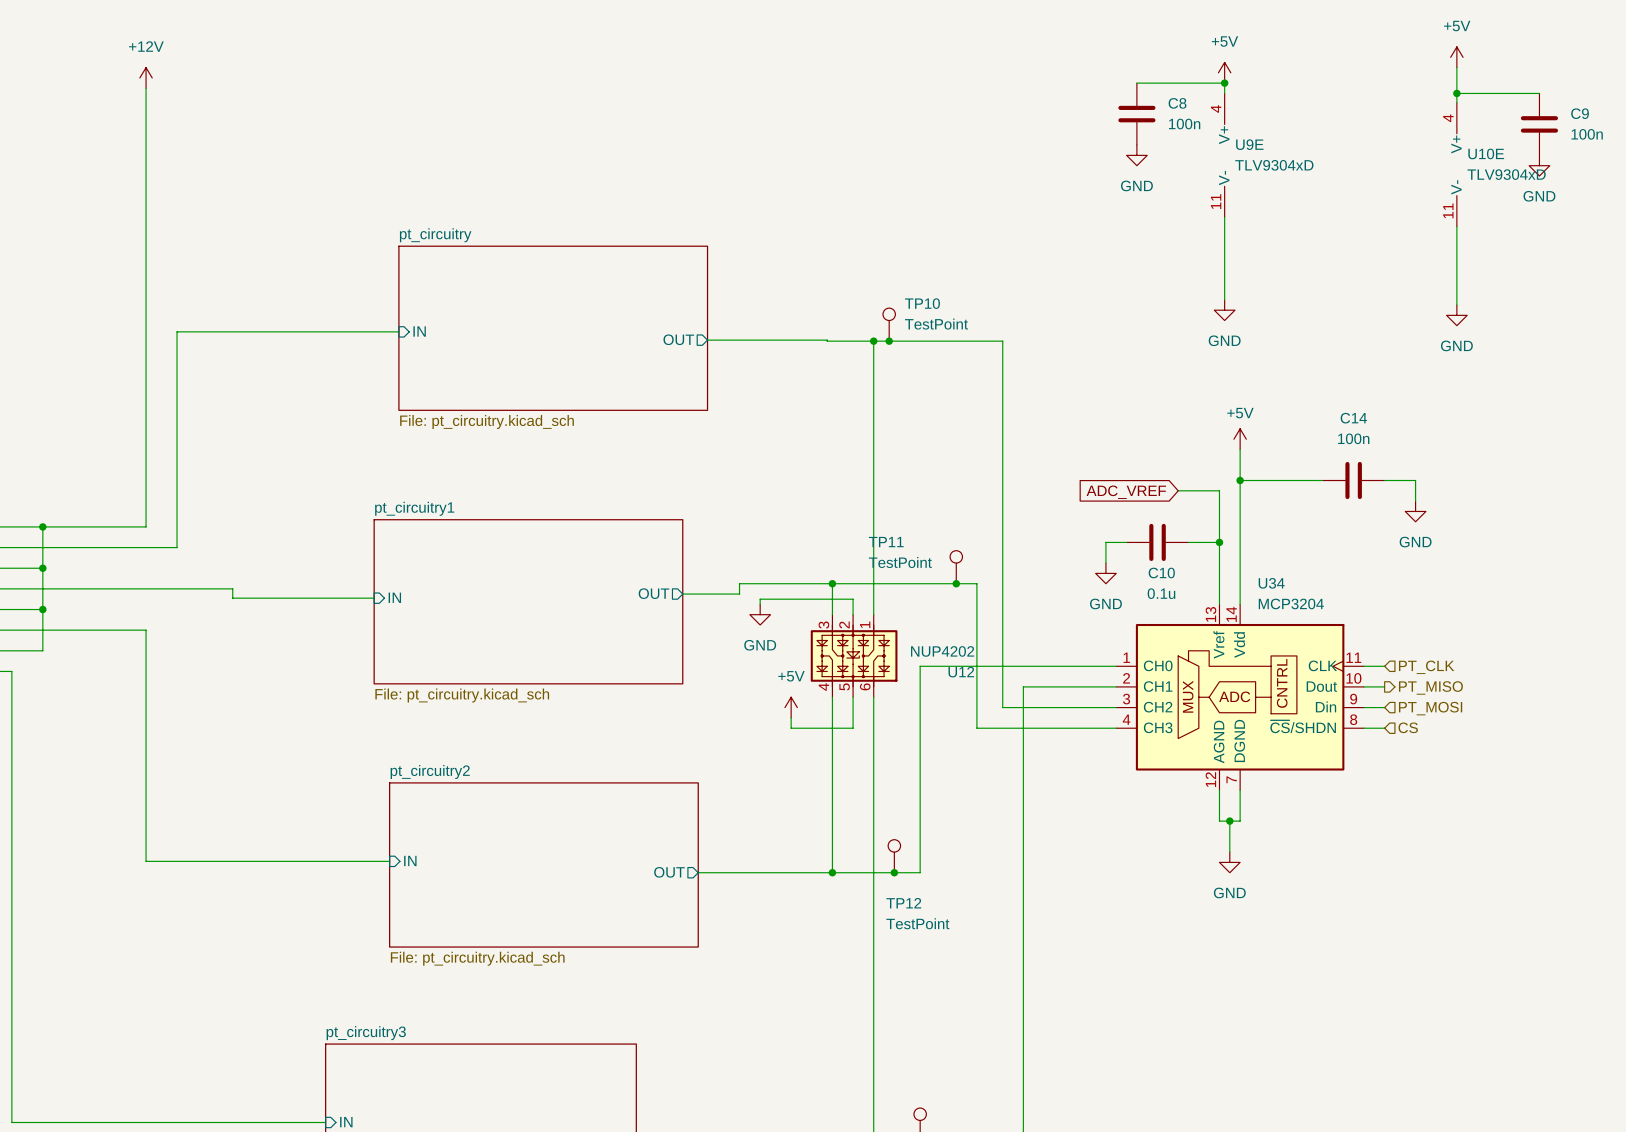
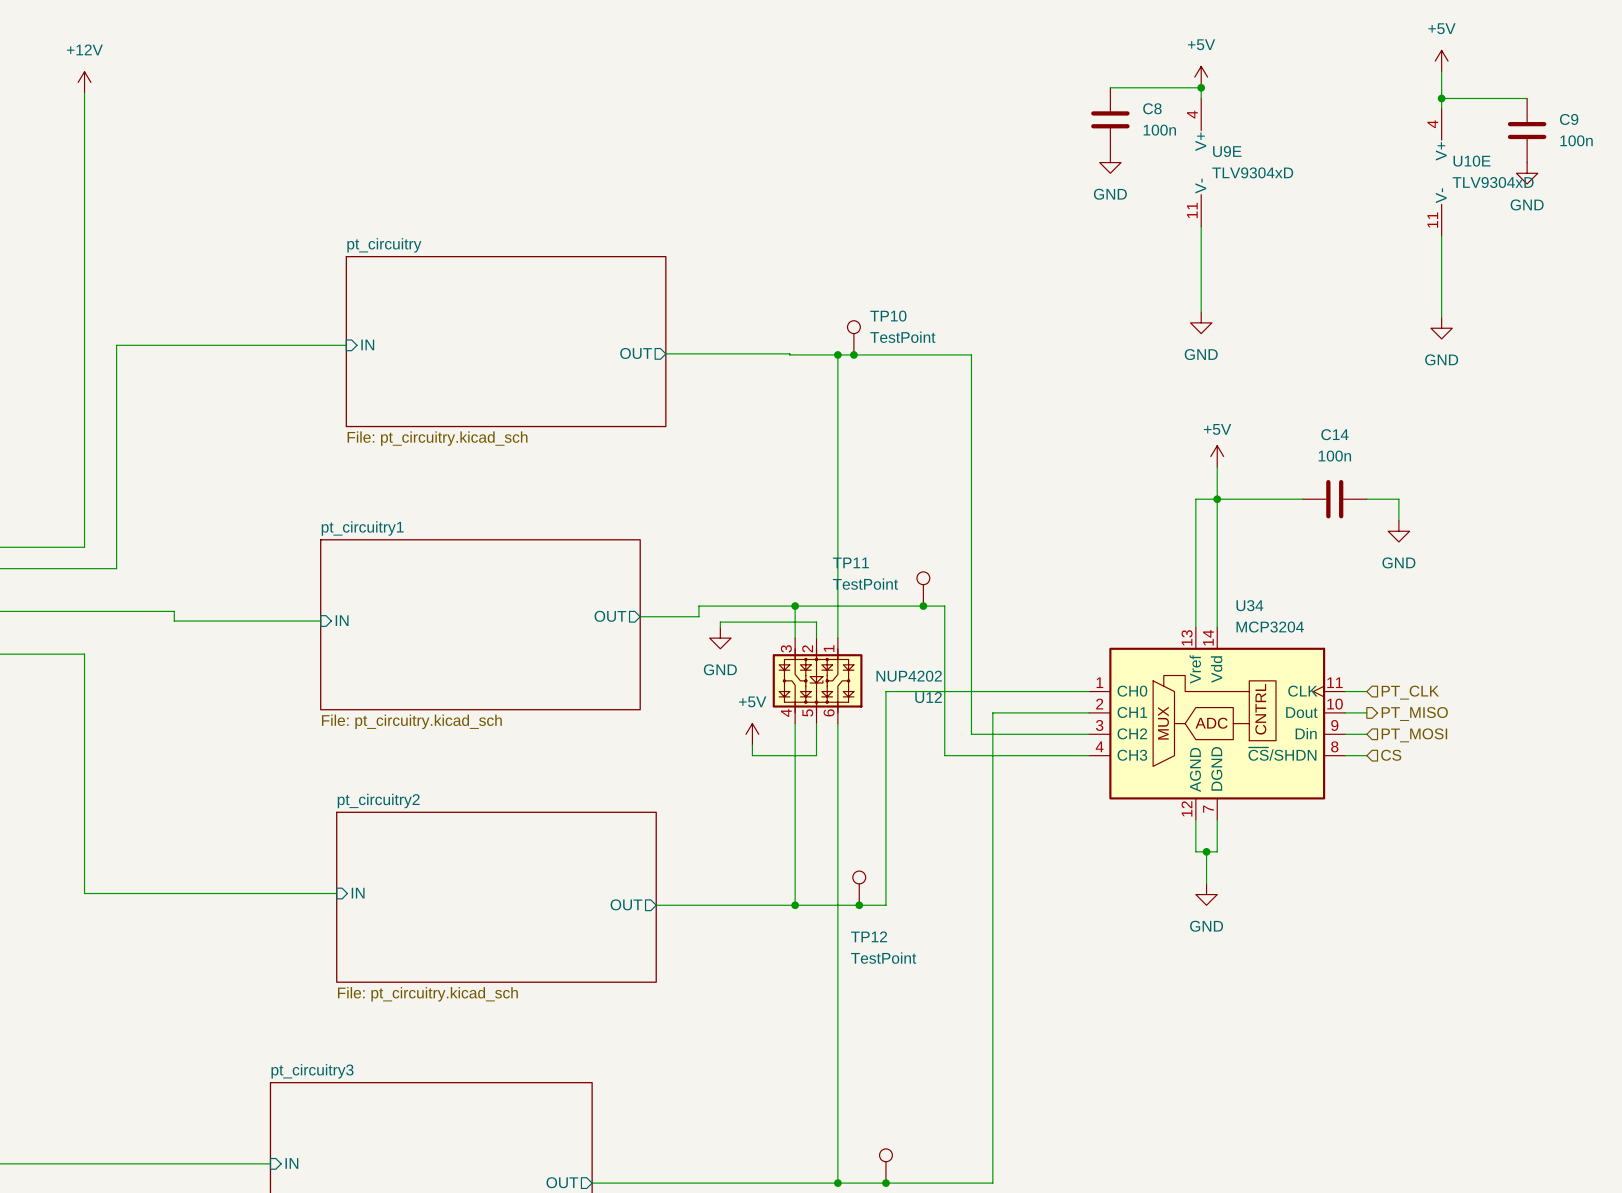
wire: (1178, 490) (1219, 490) -> (1217, 499) (1195, 499) (1195, 509)
global label: ADC_VREF (1126, 492) -> none
wire: (1126, 542) (1105, 542) (1105, 563) -> none
C10: 0.1u (1157, 542) -> none
wire: (1188, 542) (1219, 542) -> none
junction: (1219, 542) -> none
power symbol: GND (1105, 573) -> none

